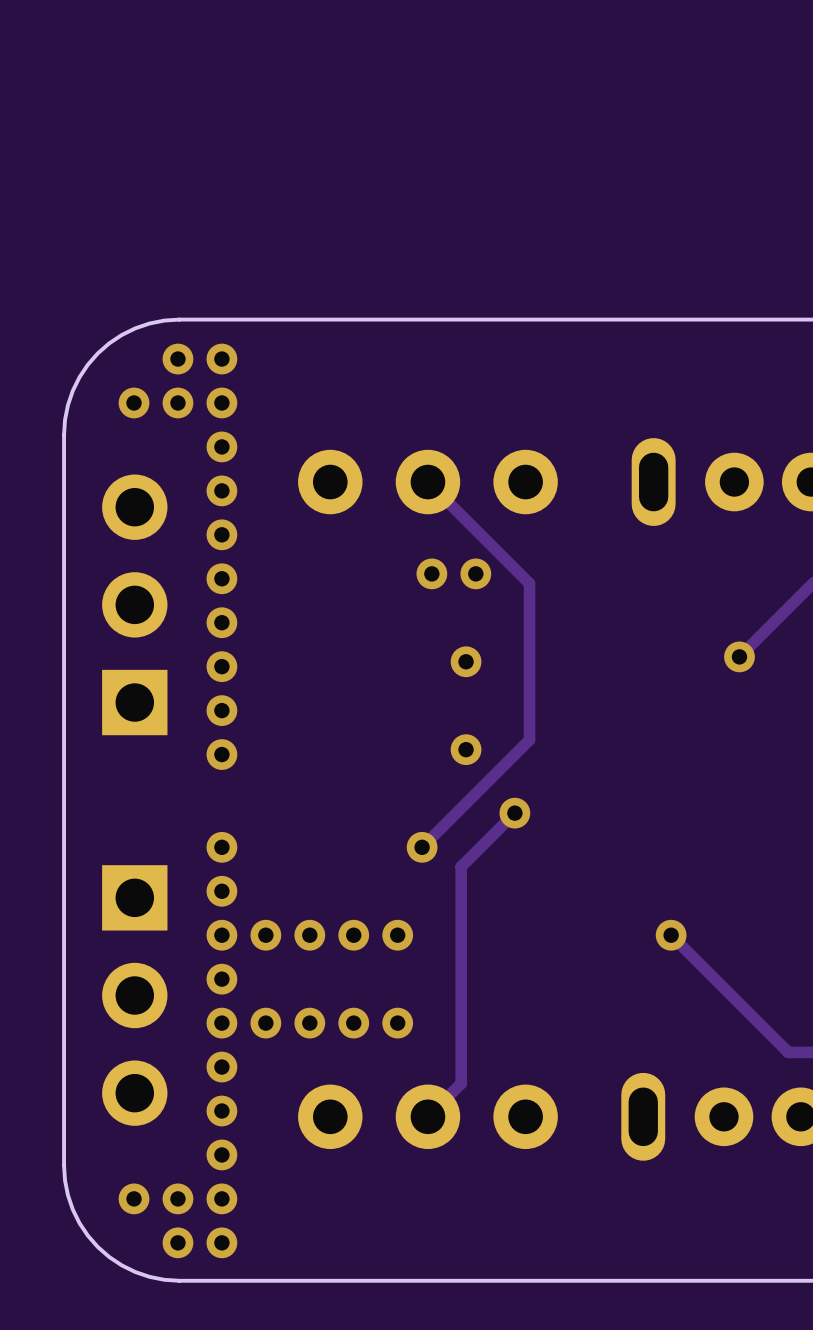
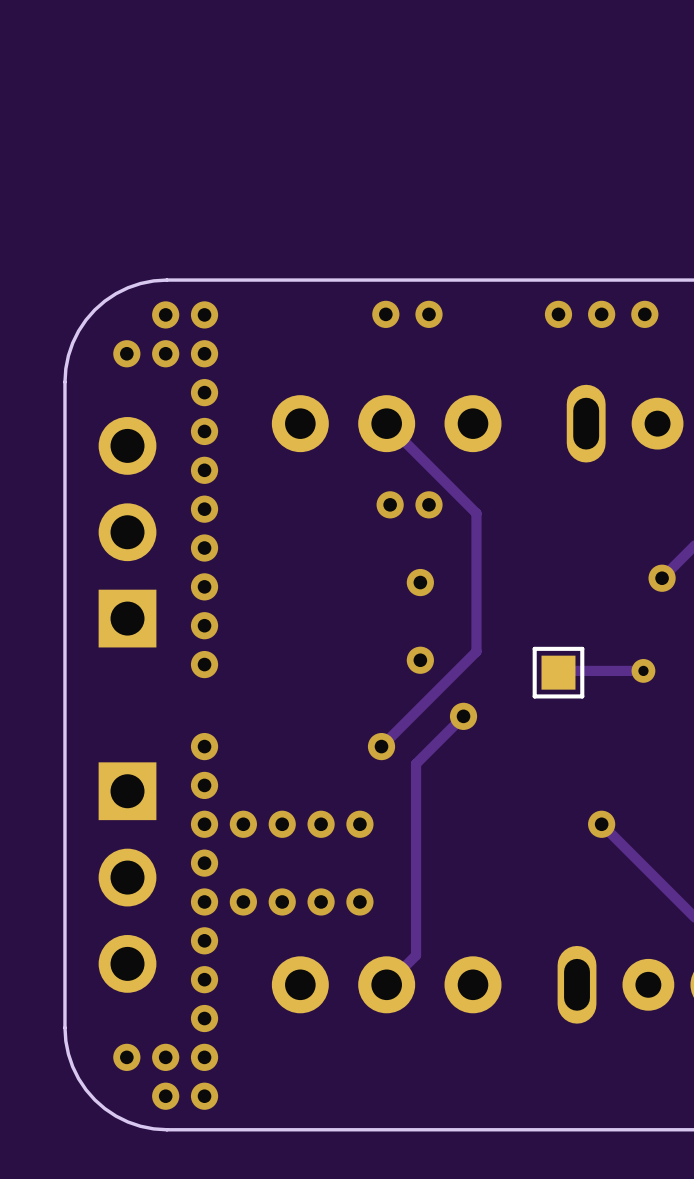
via: none -> (385, 314)
via: none -> (428, 314)
via: none -> (558, 314)
via: none -> (601, 314)
via: none -> (644, 314)
track: none -> (643, 670) (560, 670) (558, 672)
via: none -> (643, 670)
part: none -> (558, 672)

